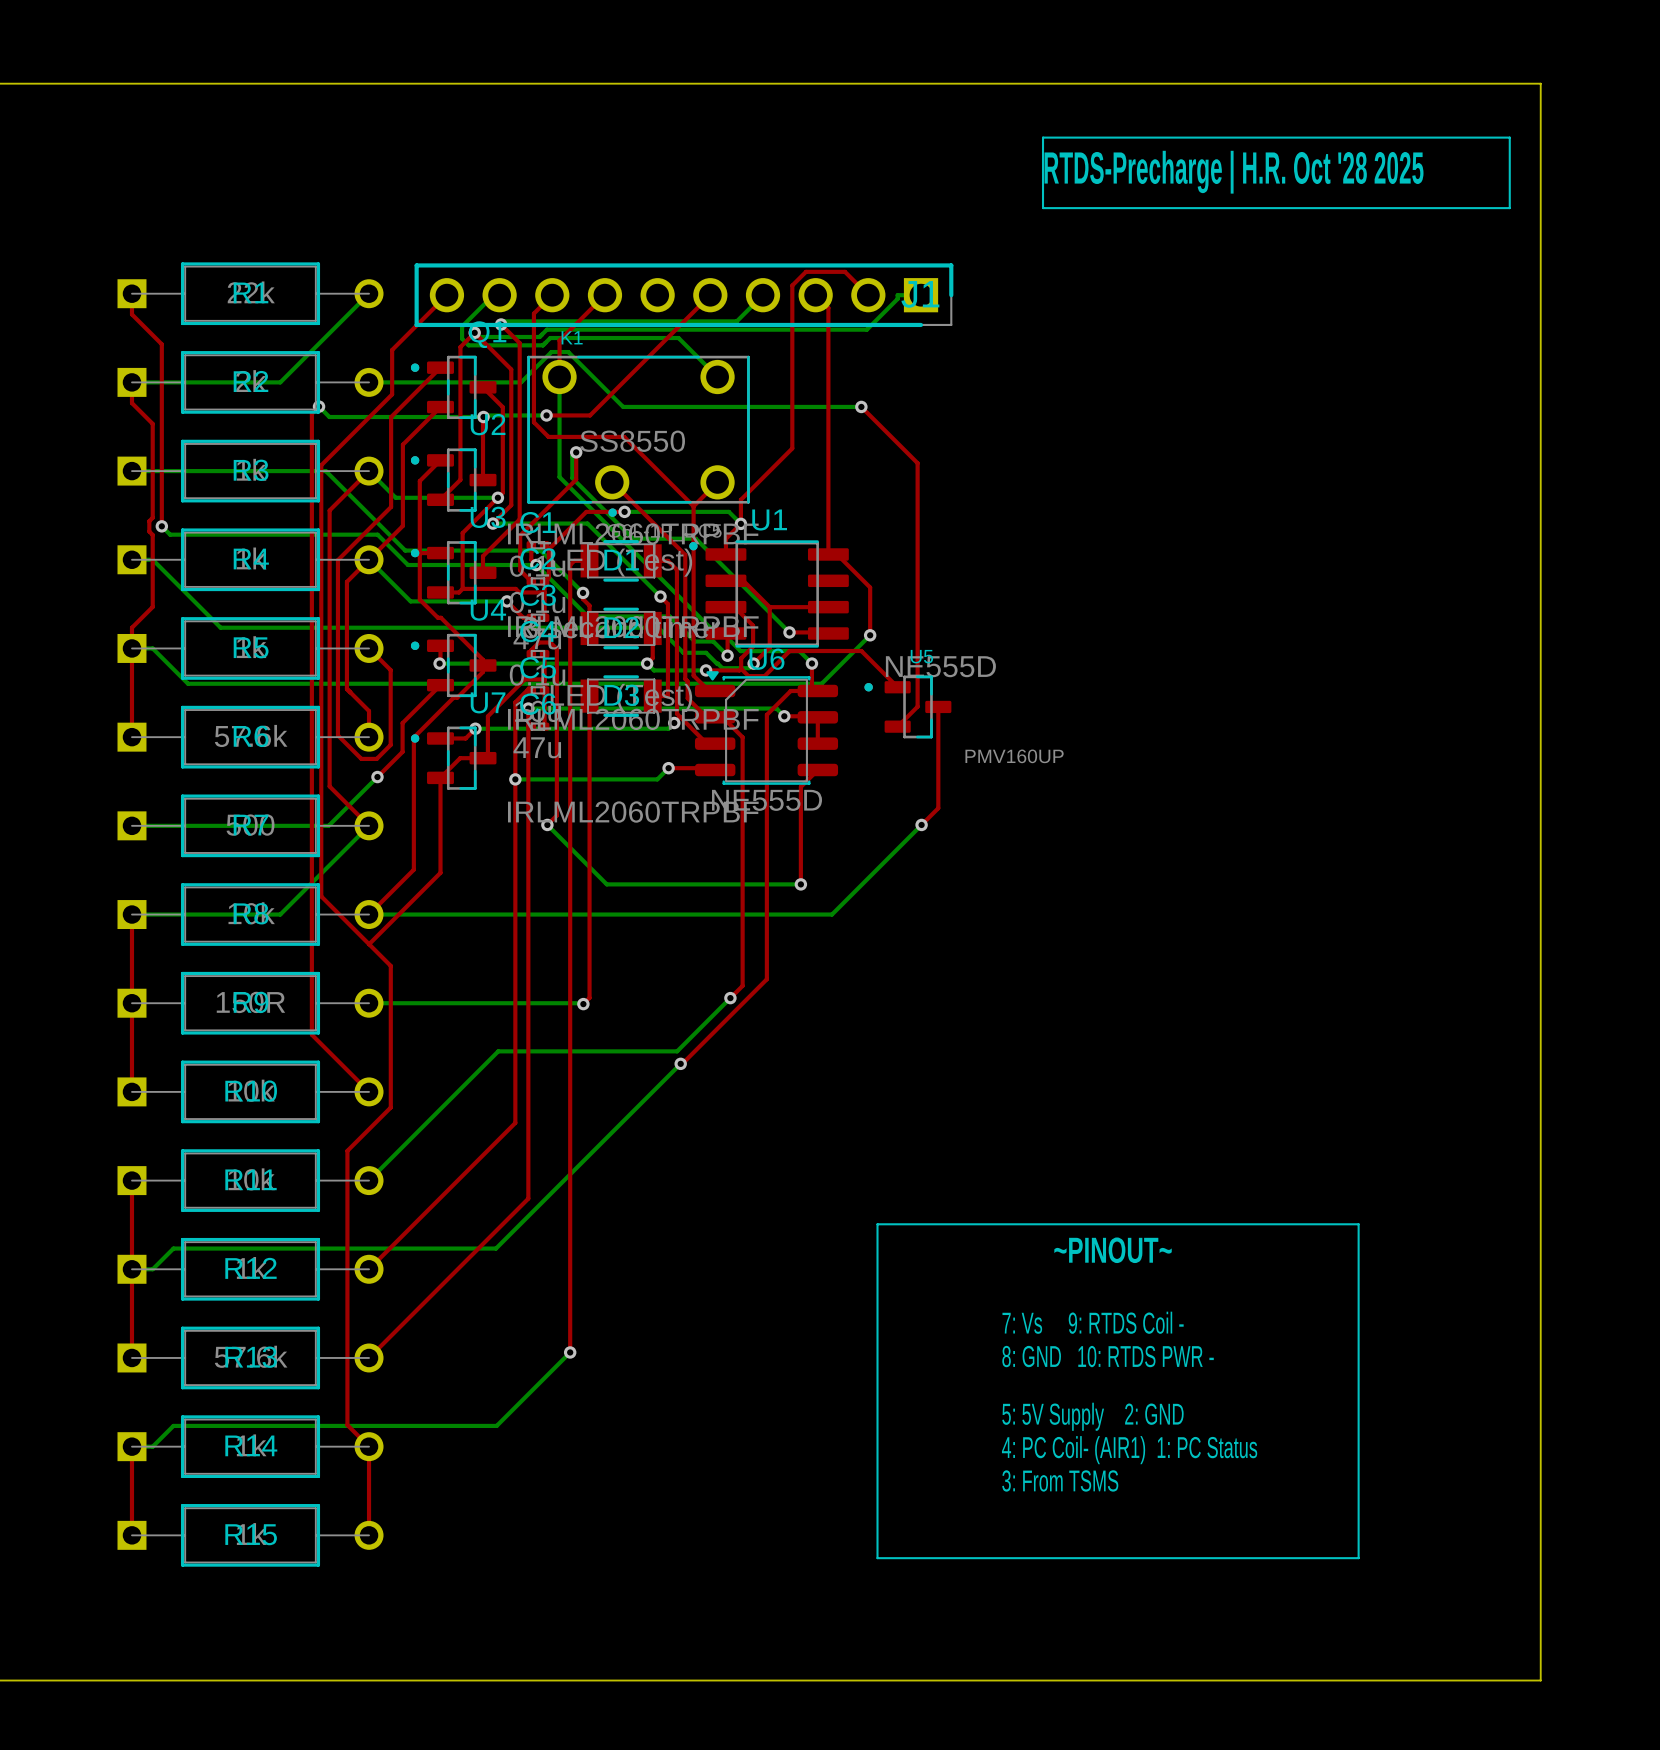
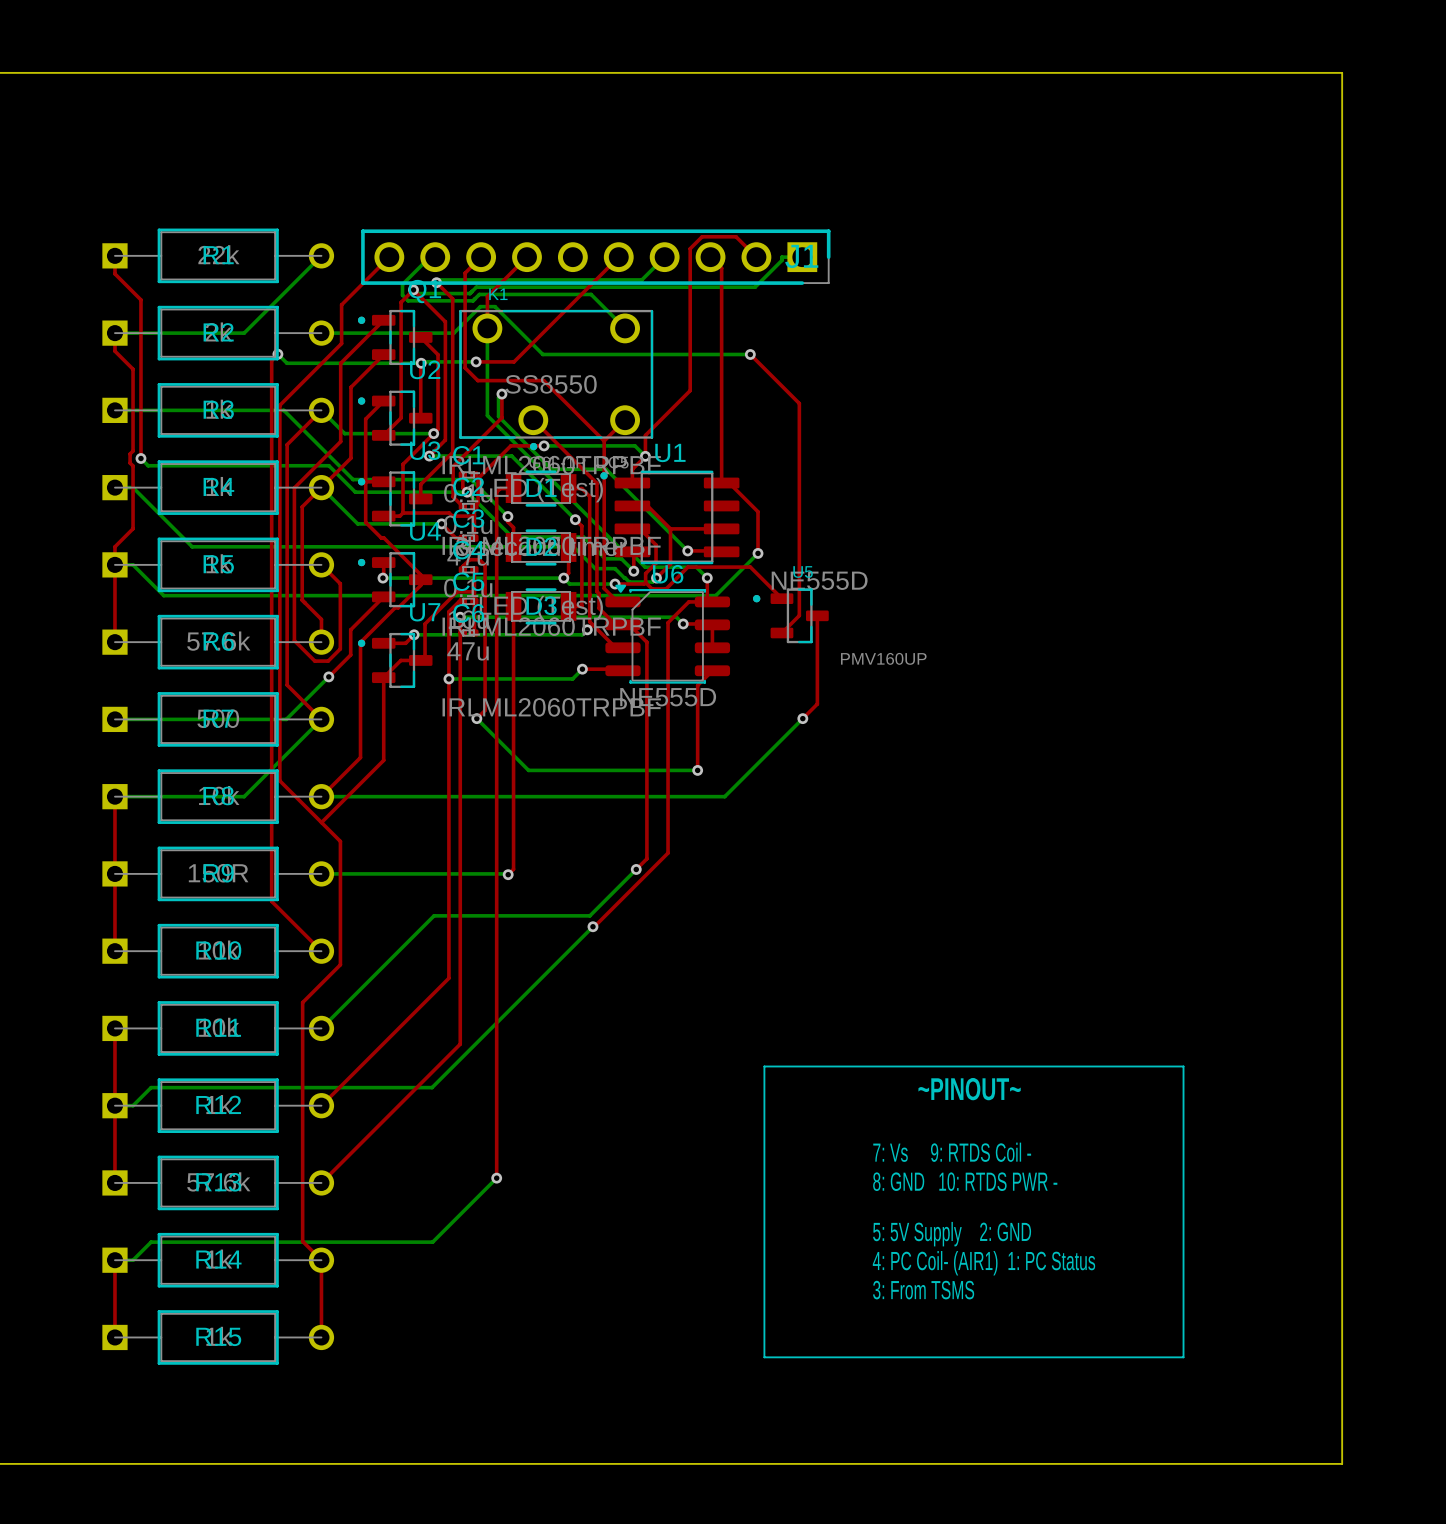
line: (1043, 137) (1509, 137) (1509, 208) (1043, 208) (1043, 137) -> none
text: RTDS-Precharge | H.R. Oct '28 2025 (1234, 172) -> none

